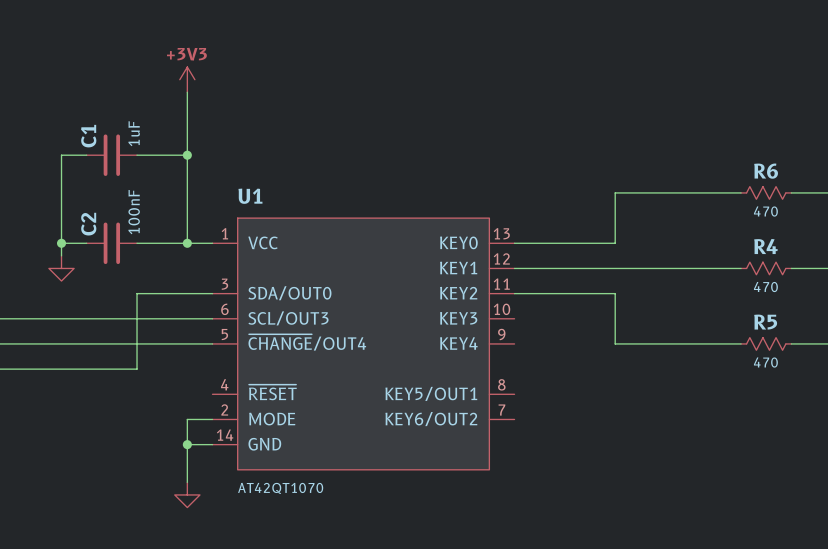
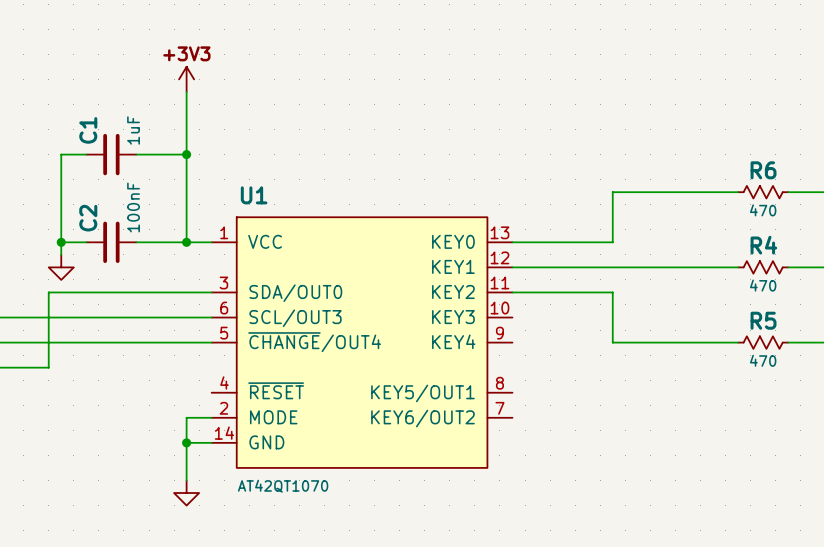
wire: (137, 293) (137, 369) (48, 369) -> (136, 292) (48, 292) (48, 367)

